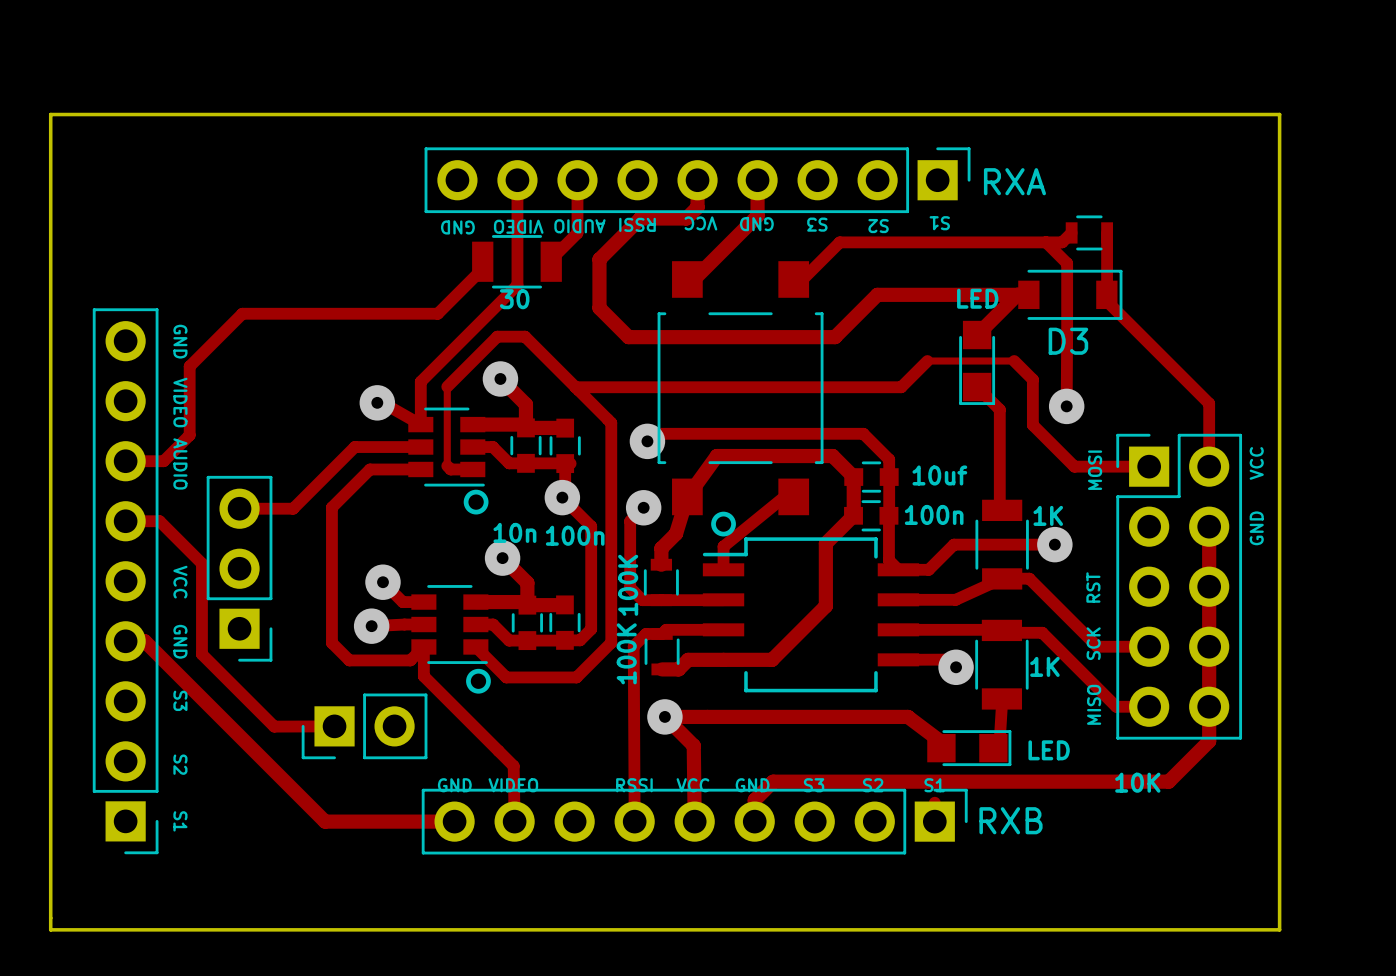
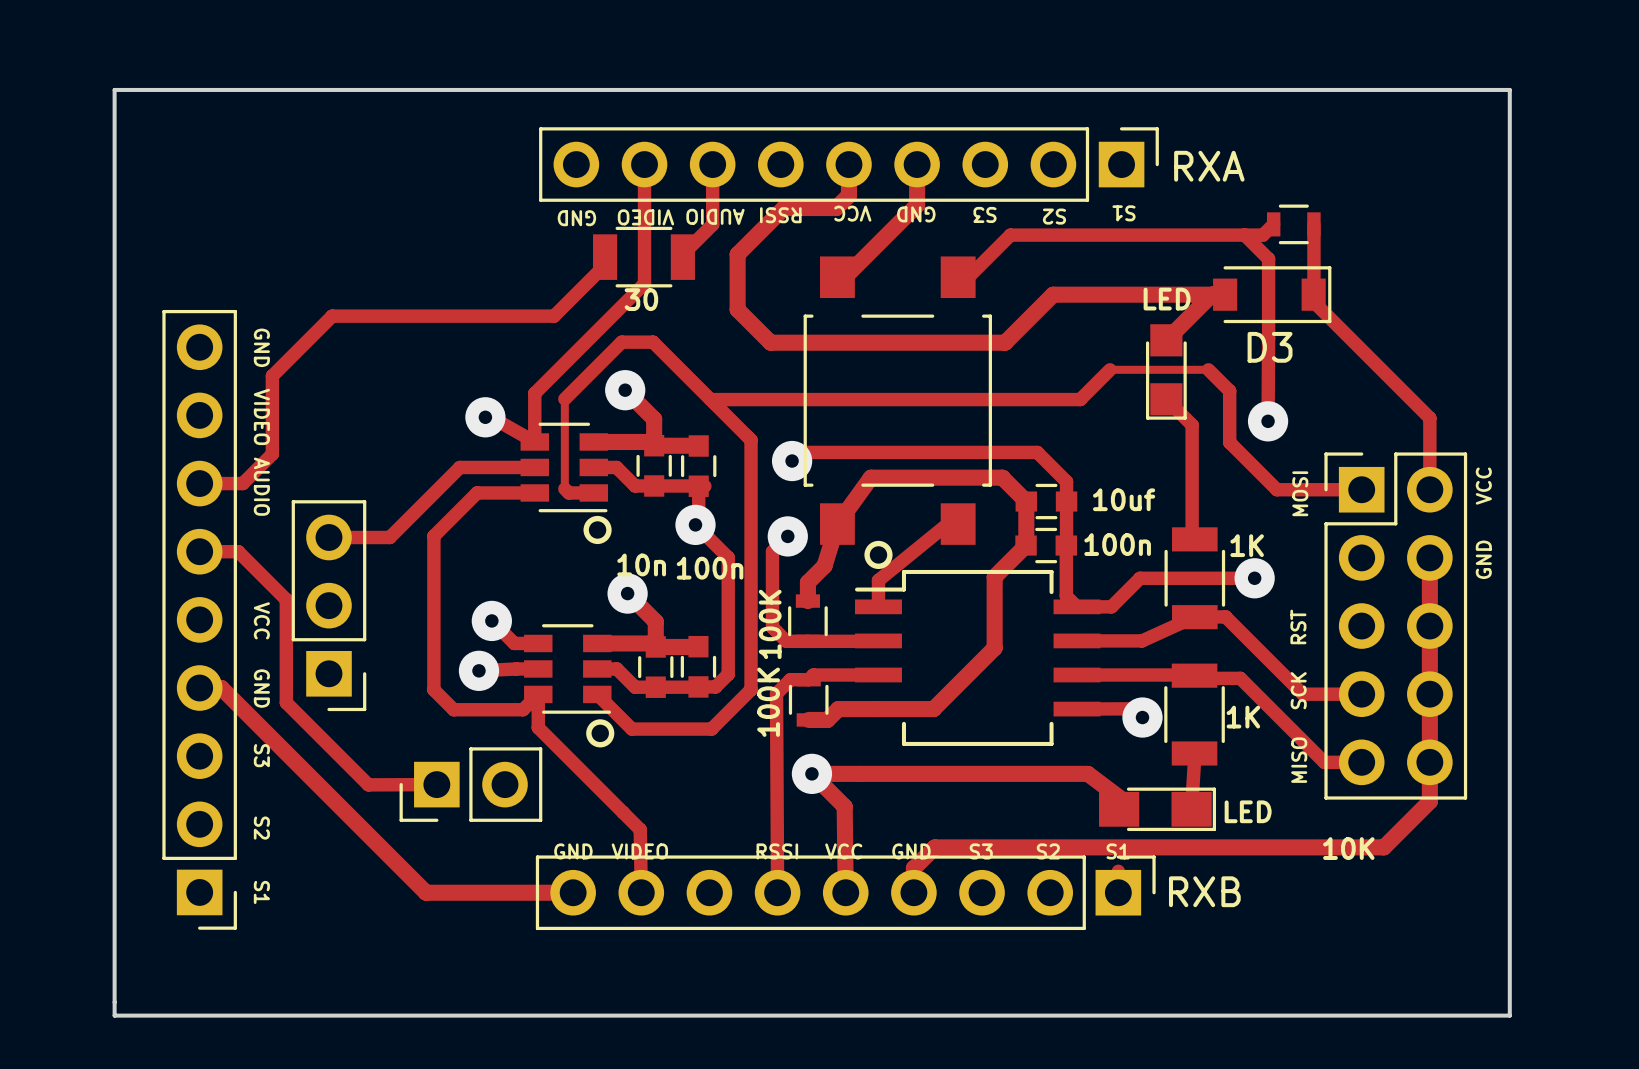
part footprint: [927, 730, 1012, 767] -> [1099, 787, 1217, 832]

